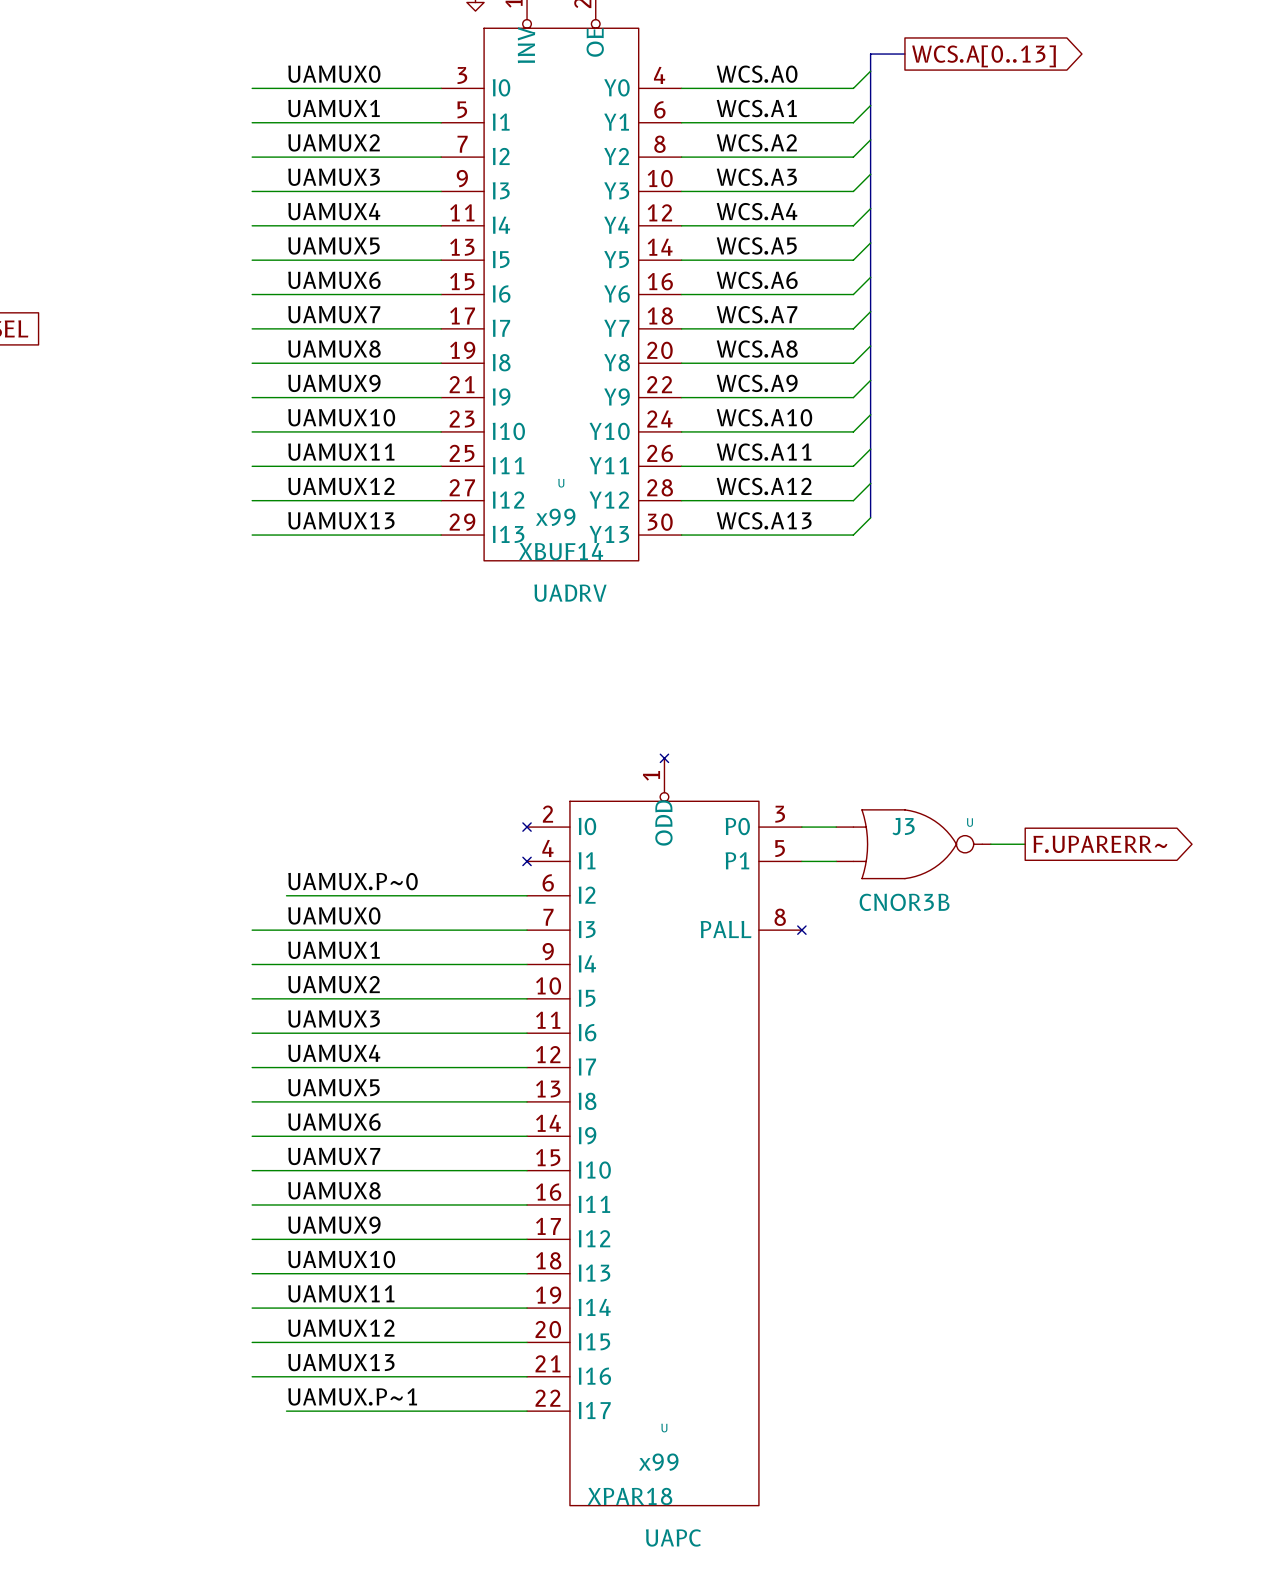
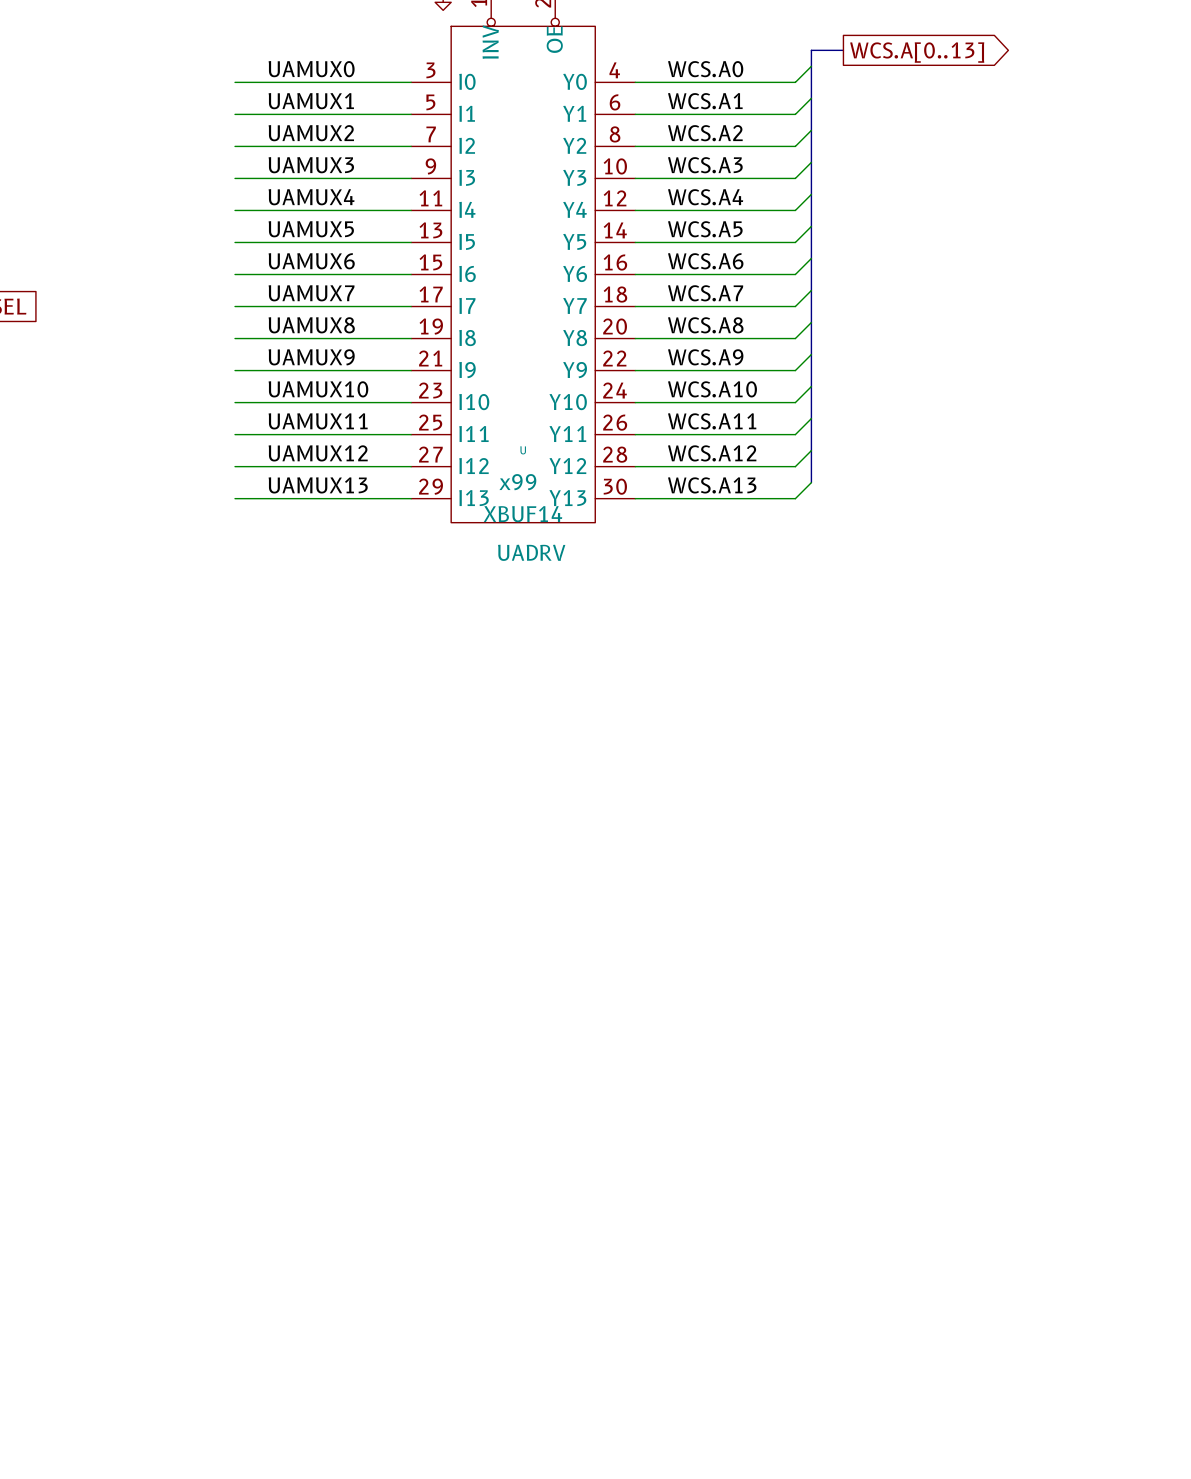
no-connect mark: (664, 758) -> none
no-connect mark: (527, 827) -> none
wire: (801, 827) (836, 827) -> none
U: (913, 844) -> none
wire: (990, 844) (1025, 844) -> none
global label: F.UPARERR~ (1100, 844) -> none
no-connect mark: (527, 861) -> none
wire: (801, 861) (836, 861) -> none
label: UAMUX.P~0 (352, 881) -> none
wire: (286, 895) (527, 895) -> none
label: UAMUX0 (334, 915) -> none
wire: (252, 930) (527, 930) -> none
no-connect mark: (801, 930) -> none
label: UAMUX1 (333, 950) -> none
wire: (252, 964) (527, 964) -> none
label: UAMUX2 (334, 984) -> none
wire: (252, 998) (527, 998) -> none
label: UAMUX3 (334, 1019) -> none
wire: (252, 1033) (527, 1033) -> none
label: UAMUX4 (334, 1053) -> none
wire: (252, 1067) (527, 1067) -> none
label: UAMUX5 (333, 1087) -> none
wire: (252, 1101) (527, 1101) -> none
label: UAMUX6 (334, 1122) -> none
U: XPAR18 (664, 1131) -> none
wire: (252, 1136) (527, 1136) -> none
label: UAMUX7 (334, 1156) -> none
wire: (252, 1170) (527, 1170) -> none
label: UAMUX8 (334, 1190) -> none
wire: (252, 1204) (527, 1204) -> none
label: UAMUX9 (334, 1225) -> none
wire: (252, 1239) (527, 1239) -> none
label: UAMUX10 (341, 1259) -> none
wire: (252, 1273) (527, 1273) -> none
label: UAMUX11 (341, 1293) -> none
wire: (252, 1308) (527, 1308) -> none
label: UAMUX12 (341, 1328) -> none
wire: (252, 1342) (527, 1342) -> none
label: UAMUX13 (341, 1362) -> none
wire: (252, 1376) (527, 1376) -> none
label: UAMUX.P~1 (352, 1396) -> none
wire: (286, 1411) (527, 1411) -> none

